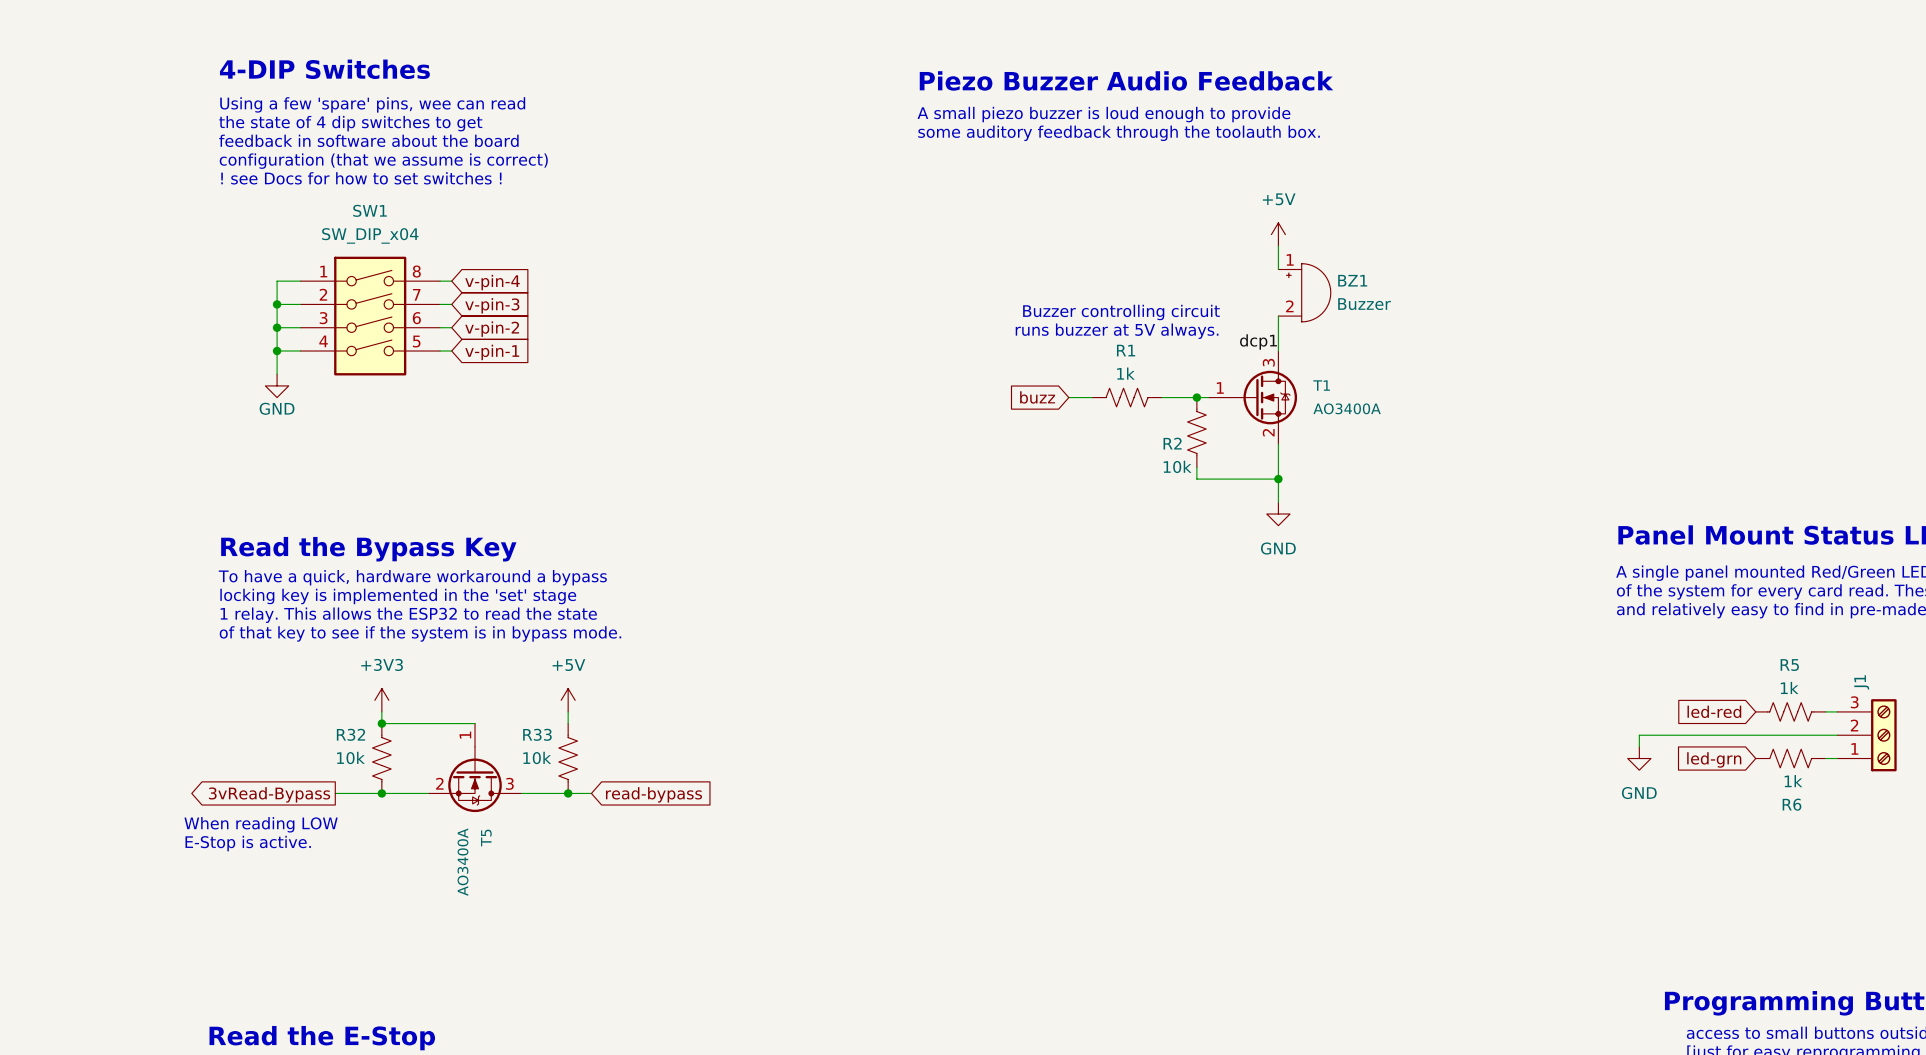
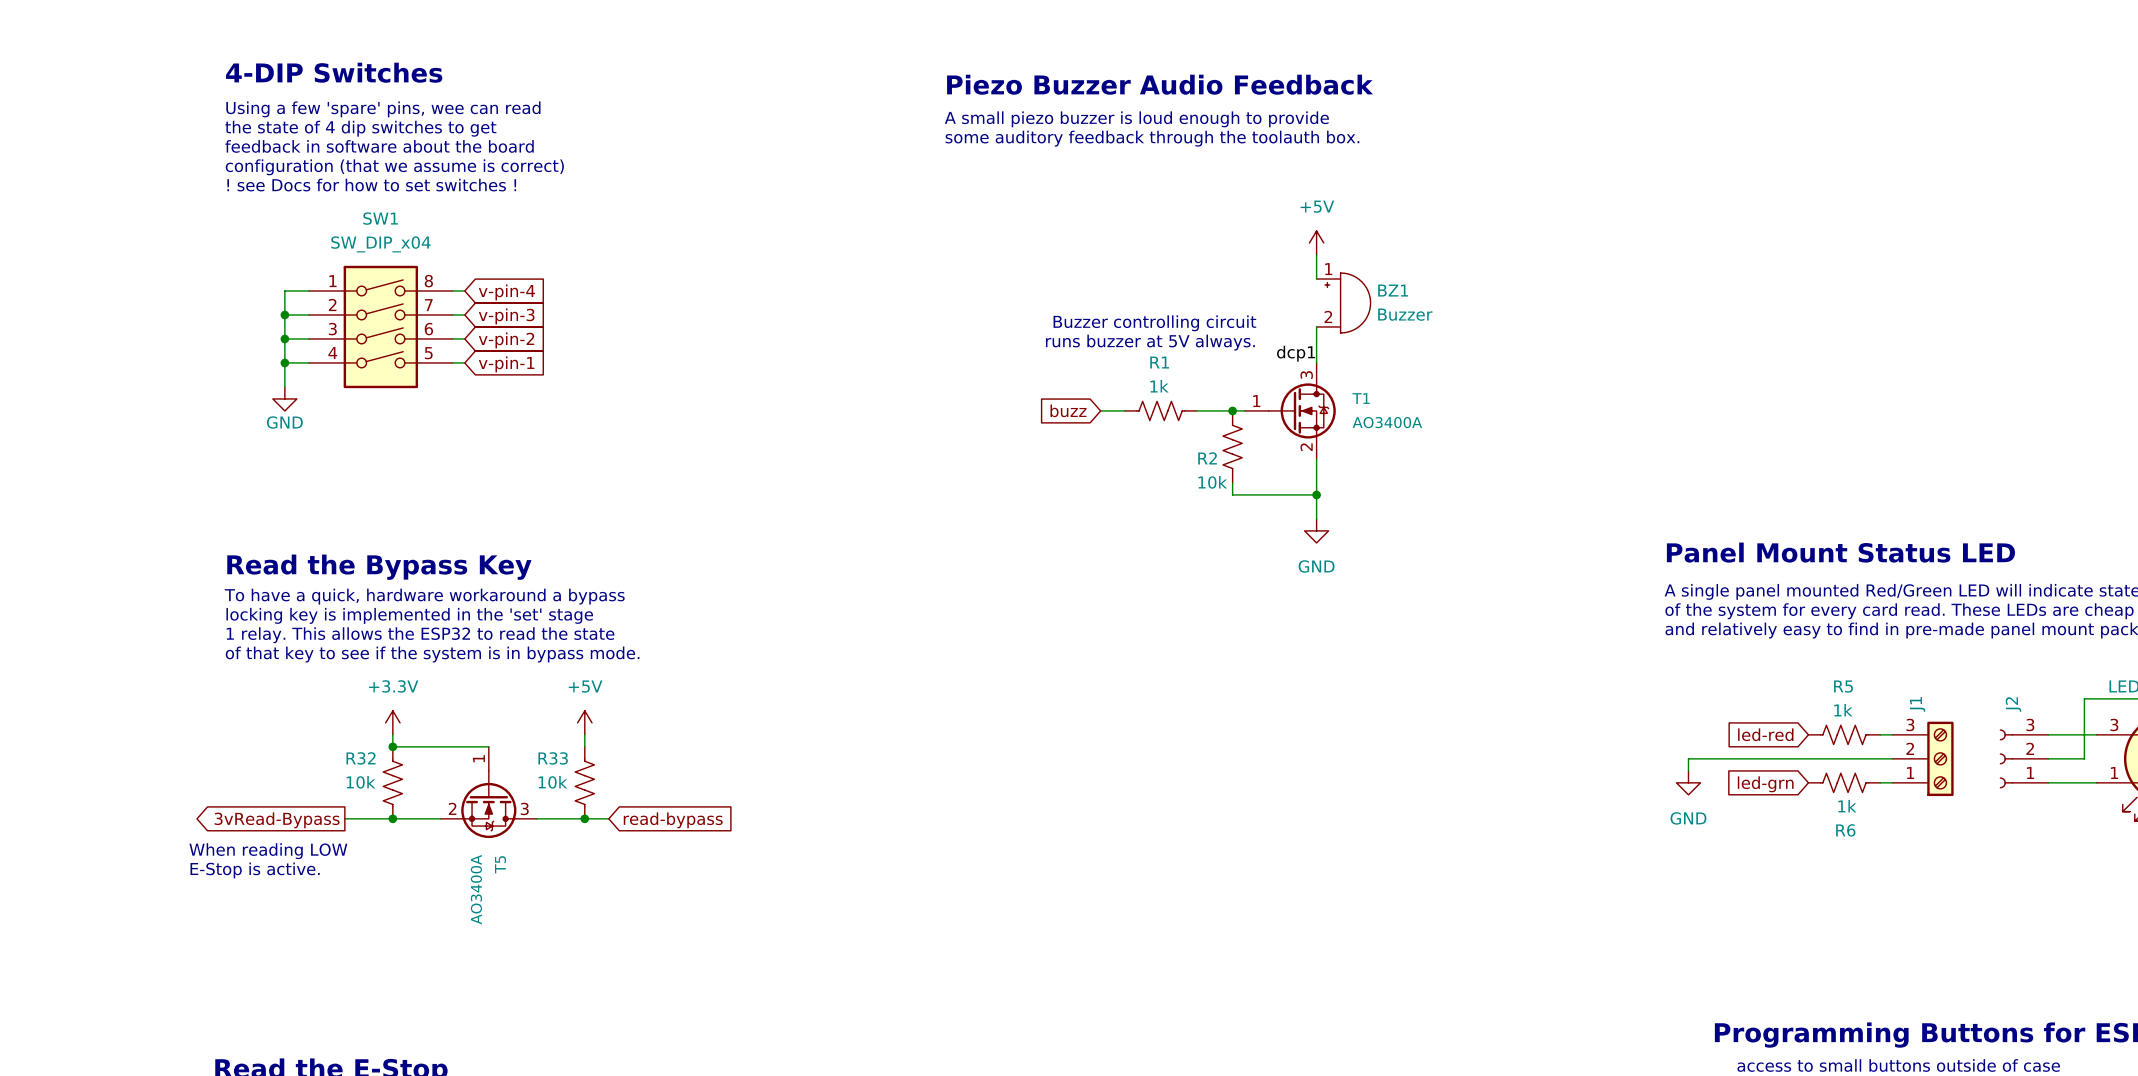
power symbol: +3V3 (381, 700) -> +3.3V (392, 722)

